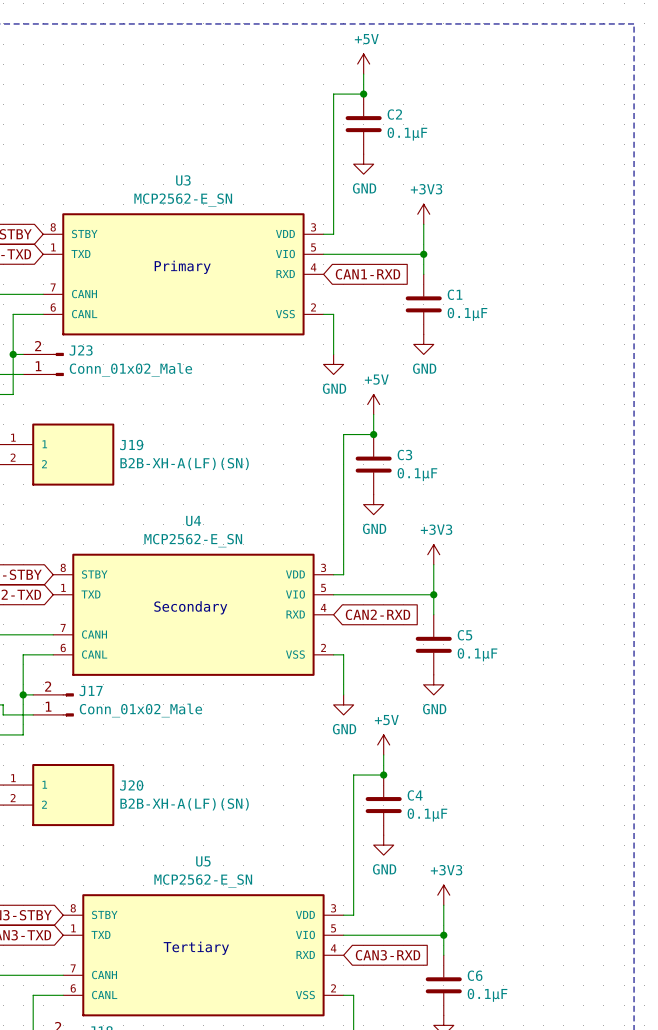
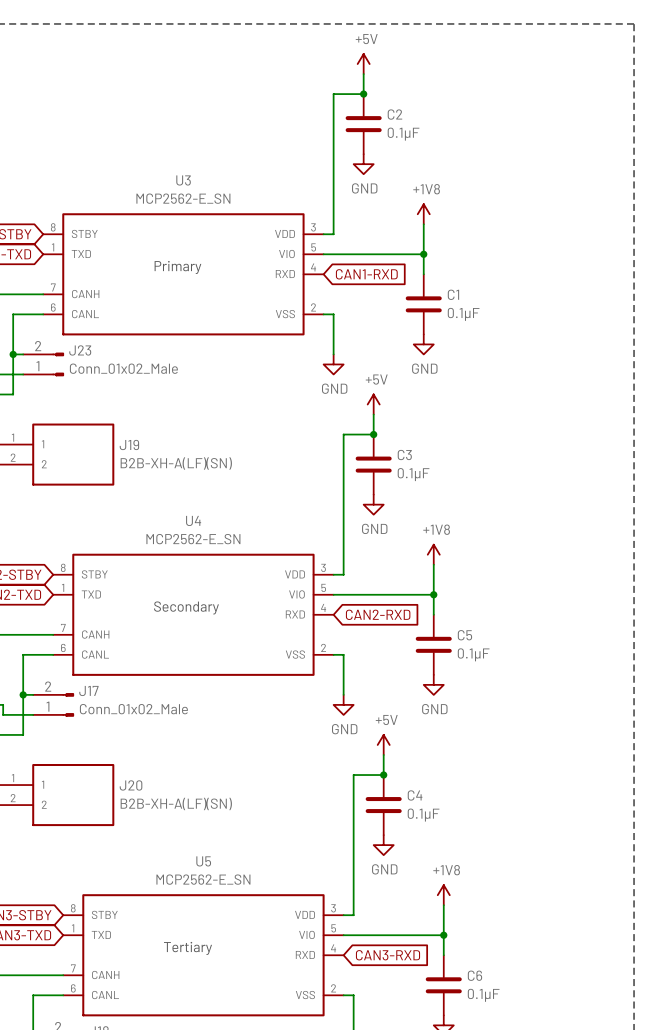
power symbol: +3V3 (423, 214) -> +1V8 (423, 214)
power symbol: +3V3 (433, 554) -> +1V8 (433, 554)
power symbol: +3V3 (443, 895) -> +1V8 (443, 895)

